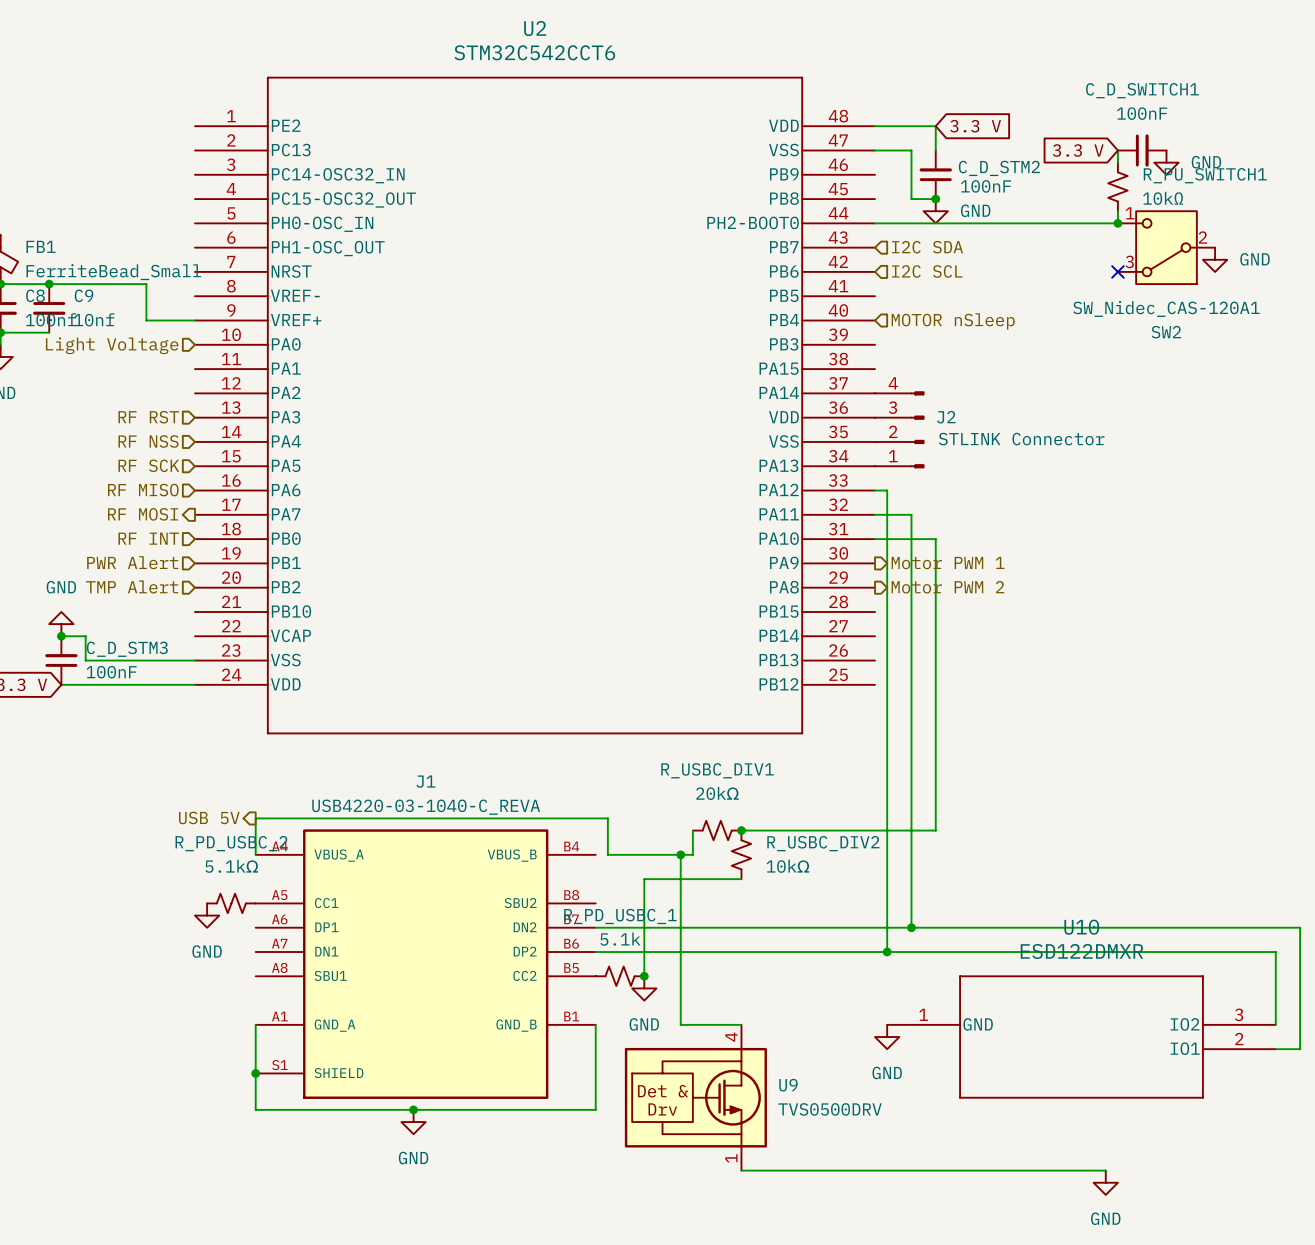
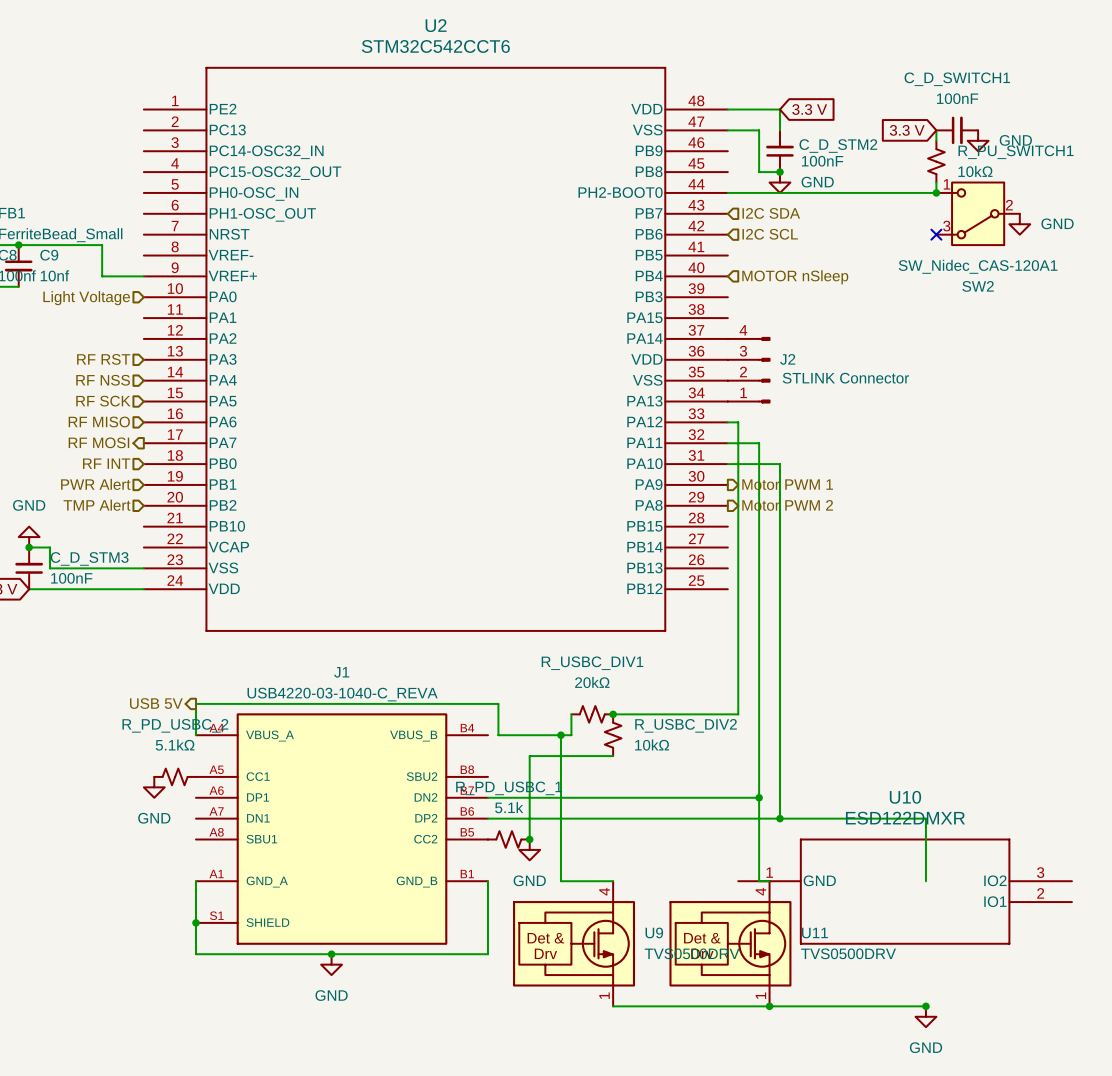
wire: (935, 830) (887, 830) (887, 952) -> (779, 714) (779, 818)
wire: (911, 927) (1300, 927) (1300, 1049) (1275, 1049) -> (759, 797) (759, 881) (769, 881)
junction position: (887, 952) -> (779, 818)
wire: (1105, 952) (1275, 952) (1275, 1024) -> (925, 818) (925, 881)
power symbol: GND (887, 1037) -> none
U11: none -> TVS0500DRV (730, 943)
junction: none -> (769, 1006)
junction: none -> (925, 1006)

